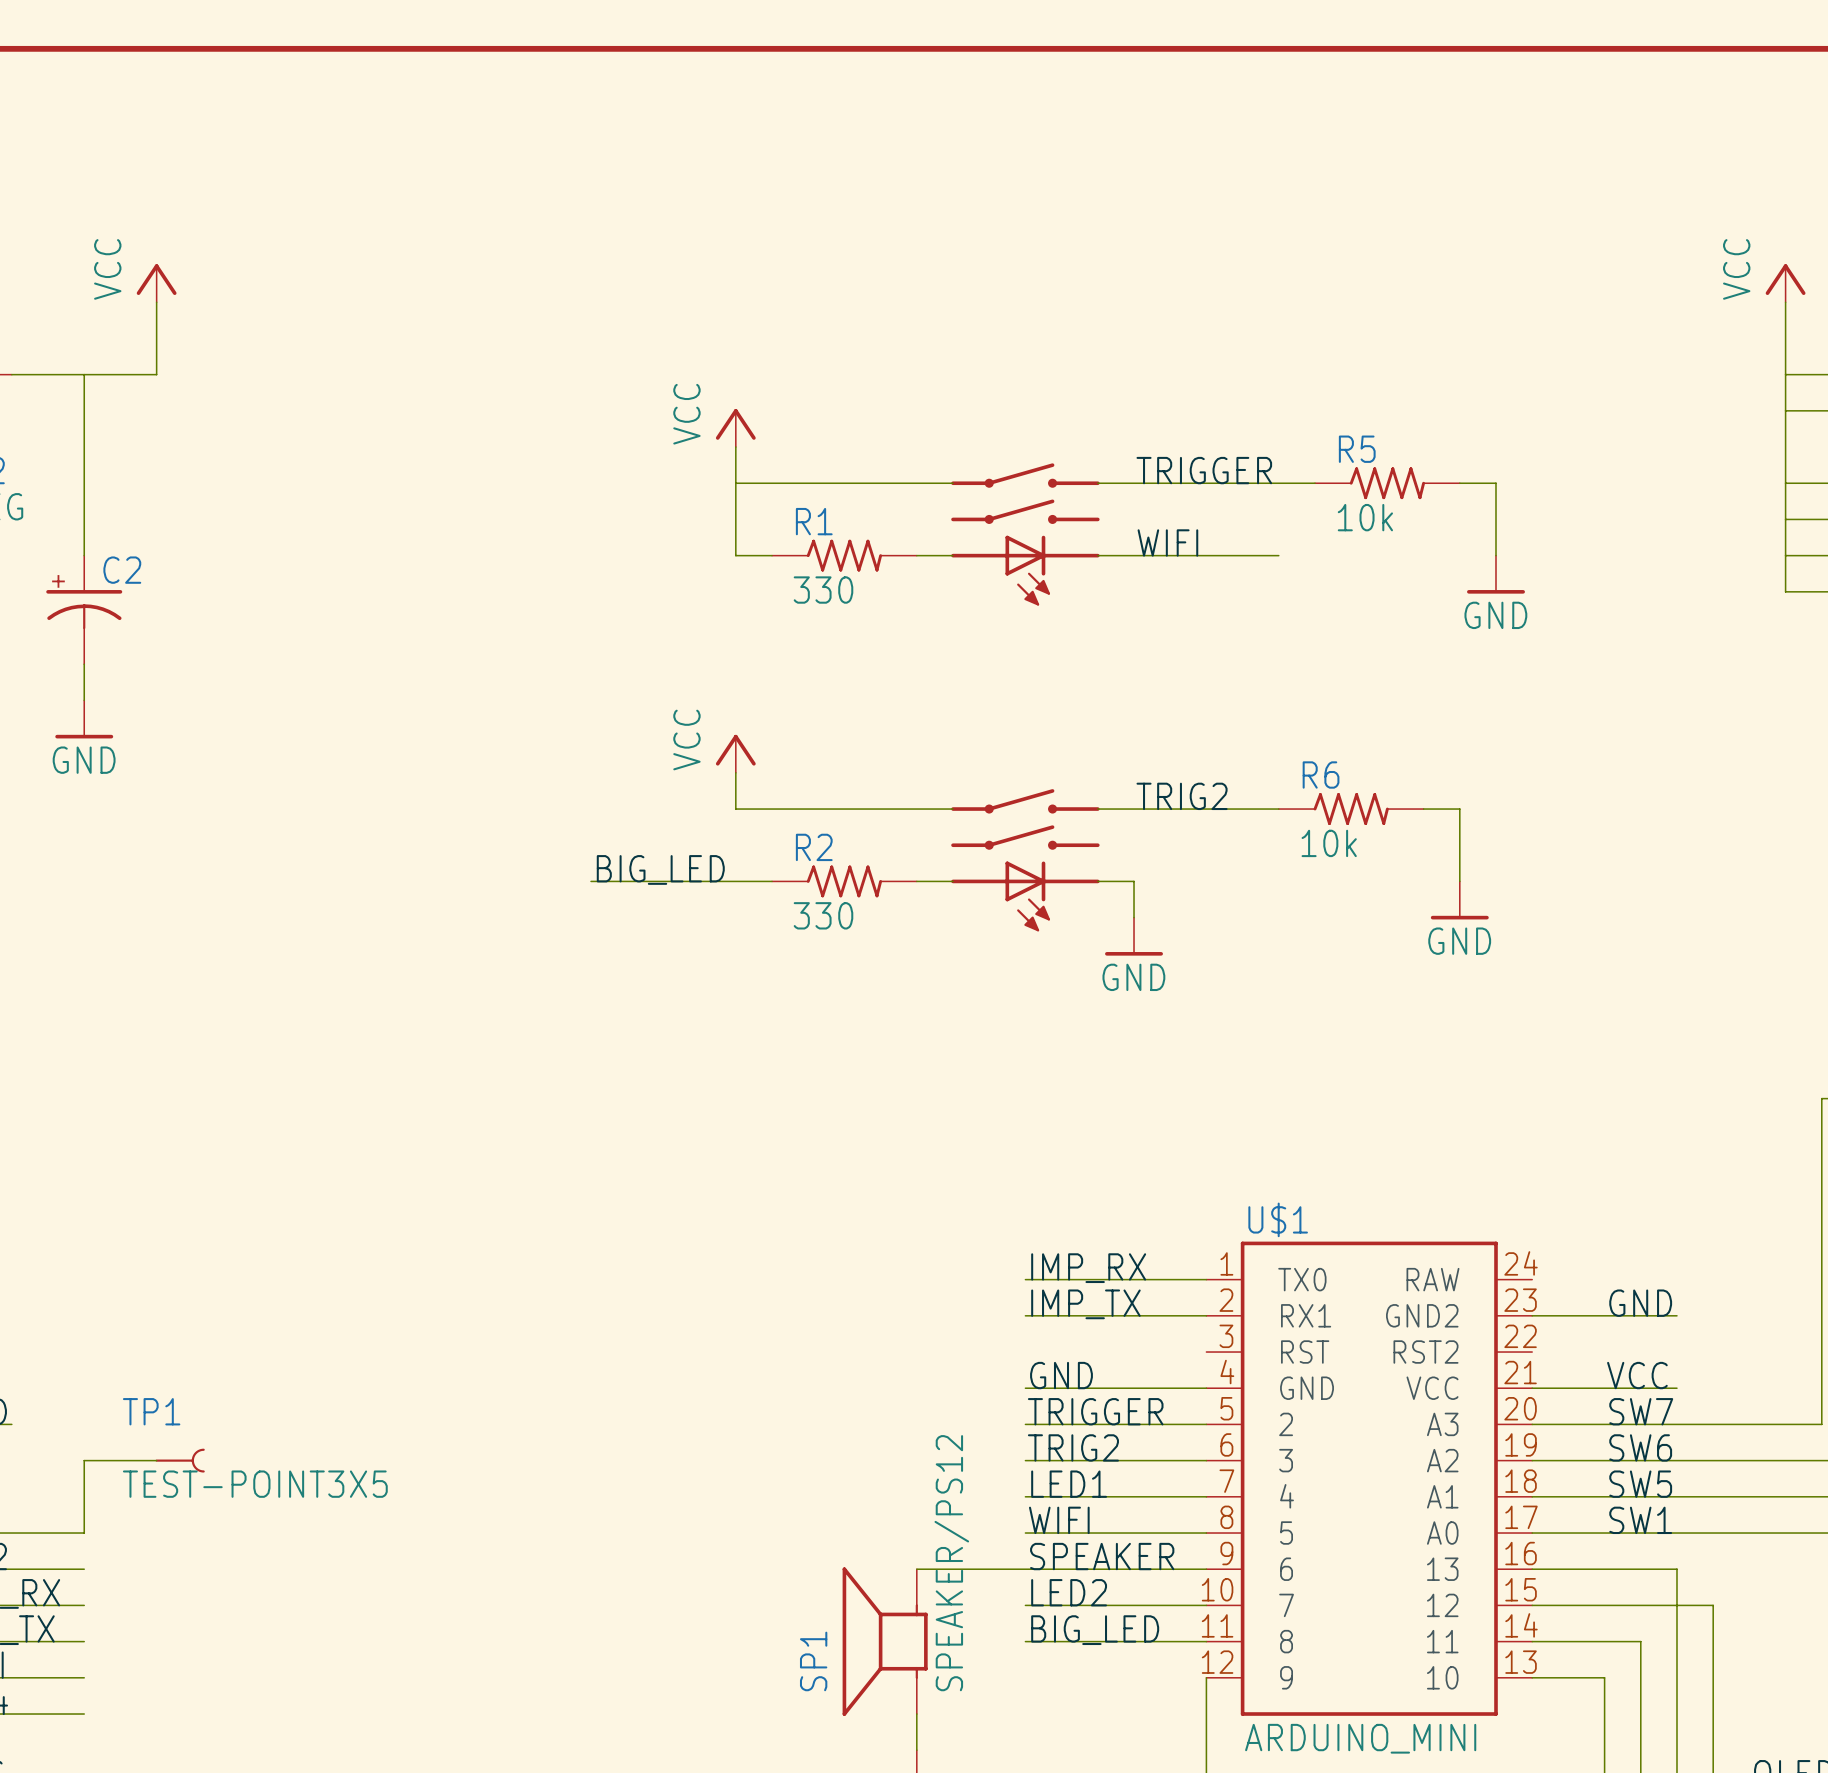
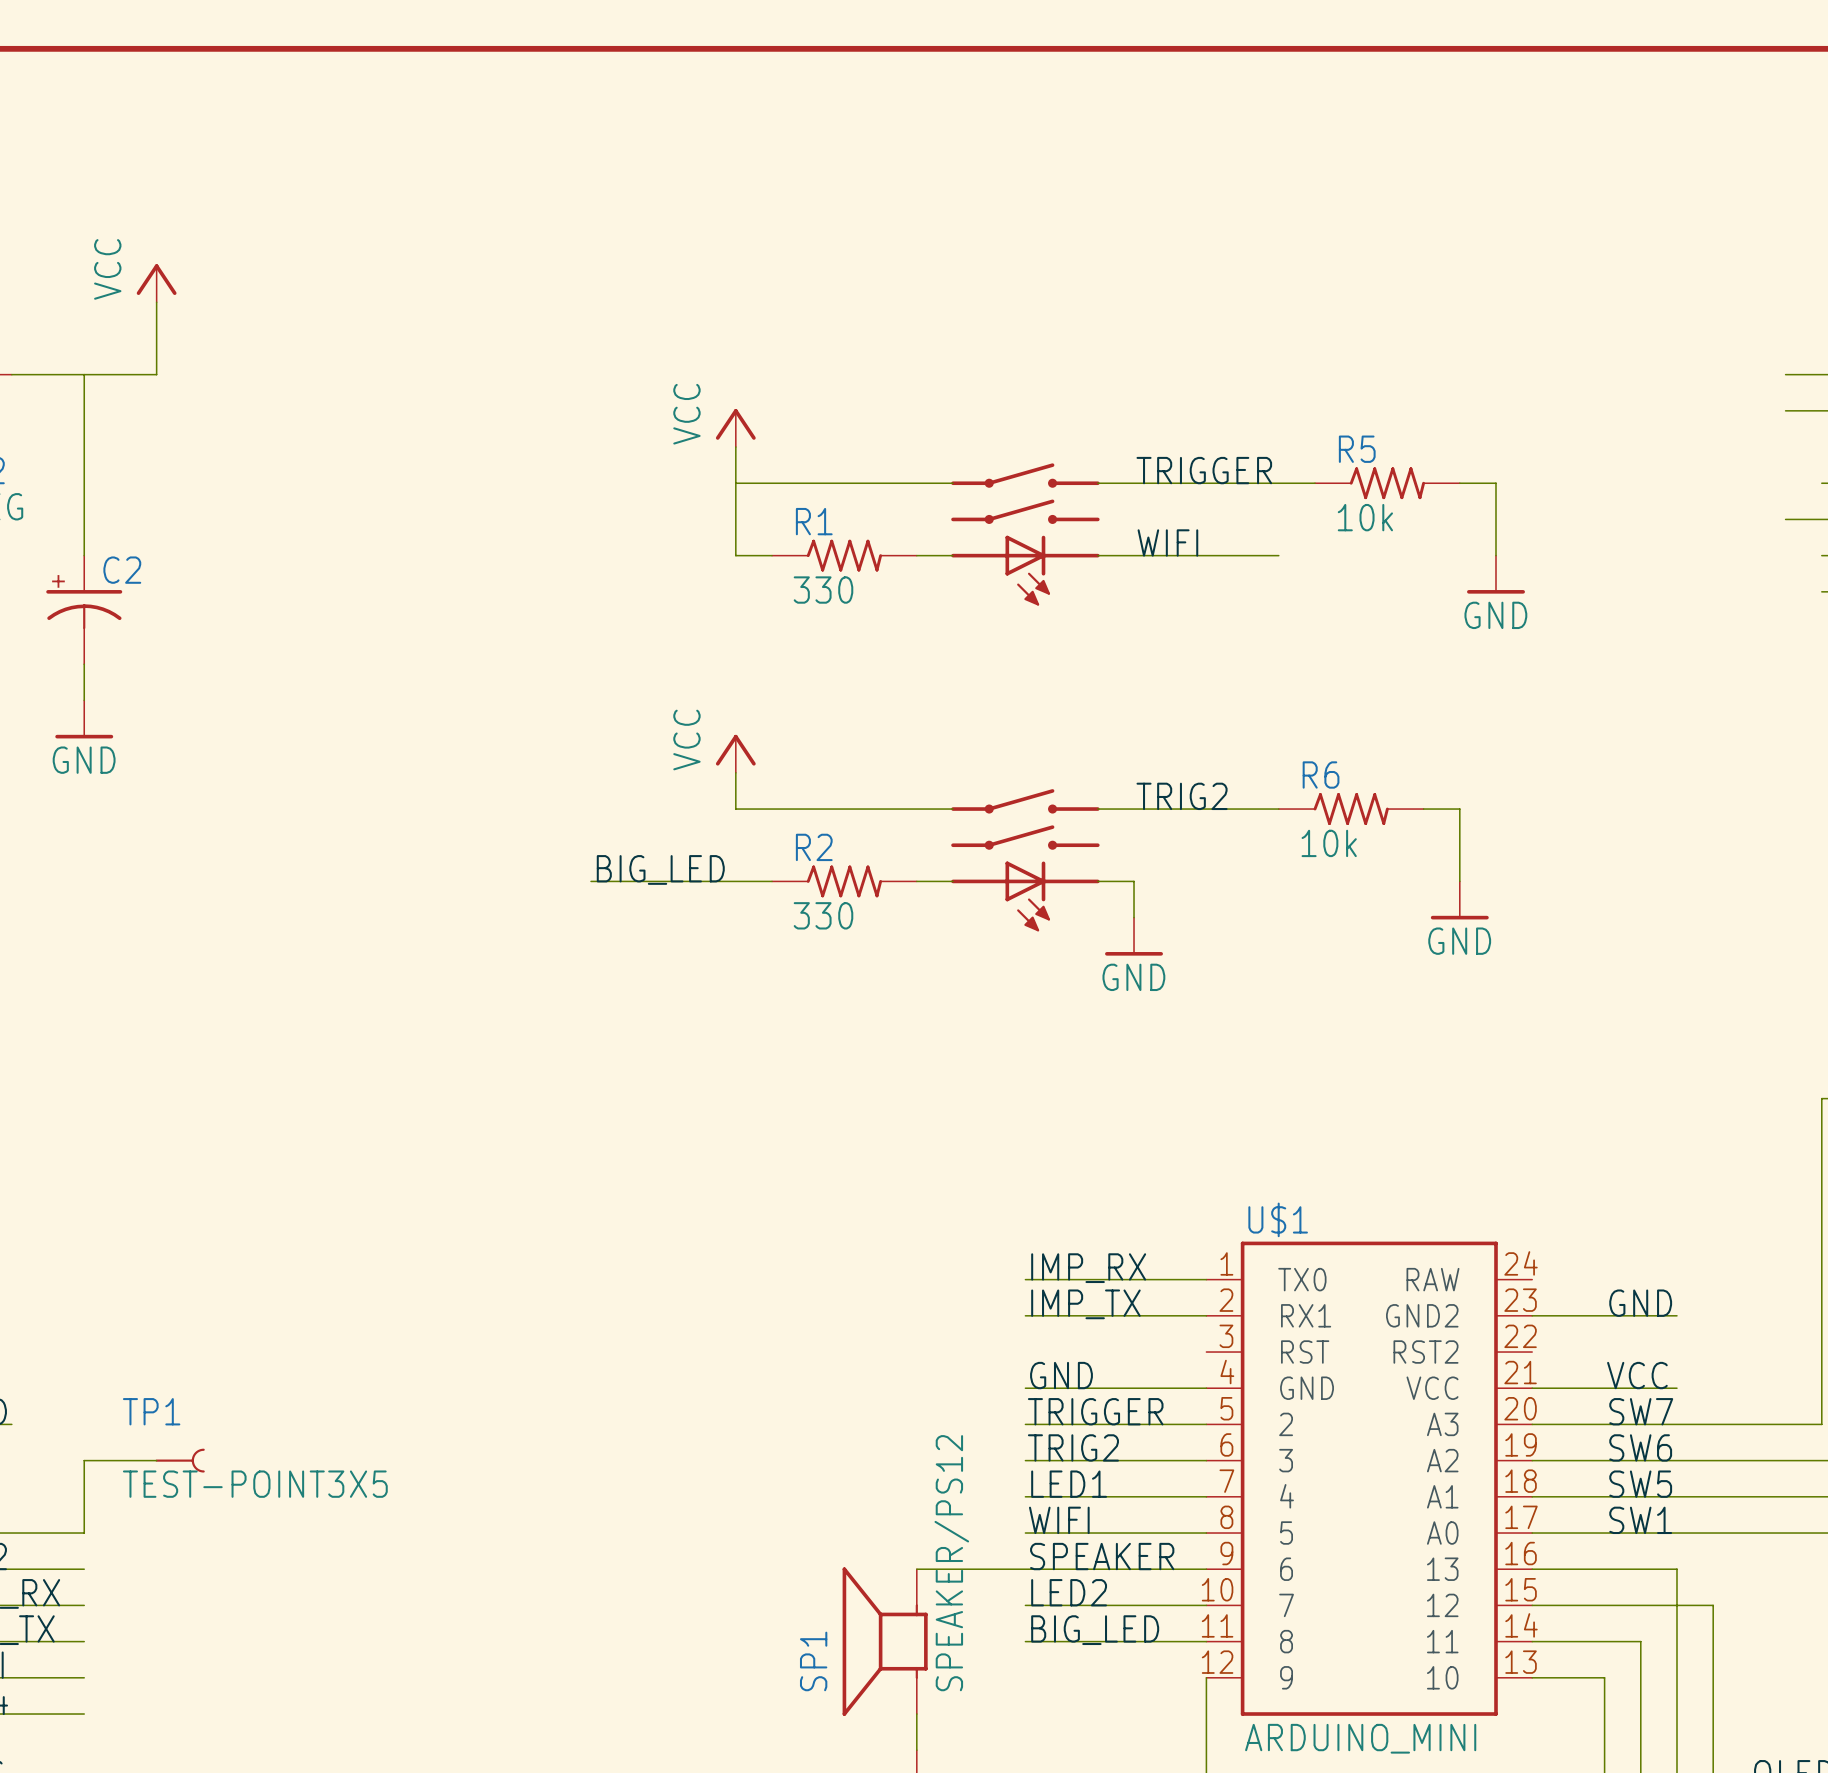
power symbol: VCC (1785, 283) -> none
wire: (1785, 302) (1785, 591) (1821, 591) -> none
wire: (1785, 483) (1821, 483) -> none
wire: (1785, 555) (1821, 555) -> none

